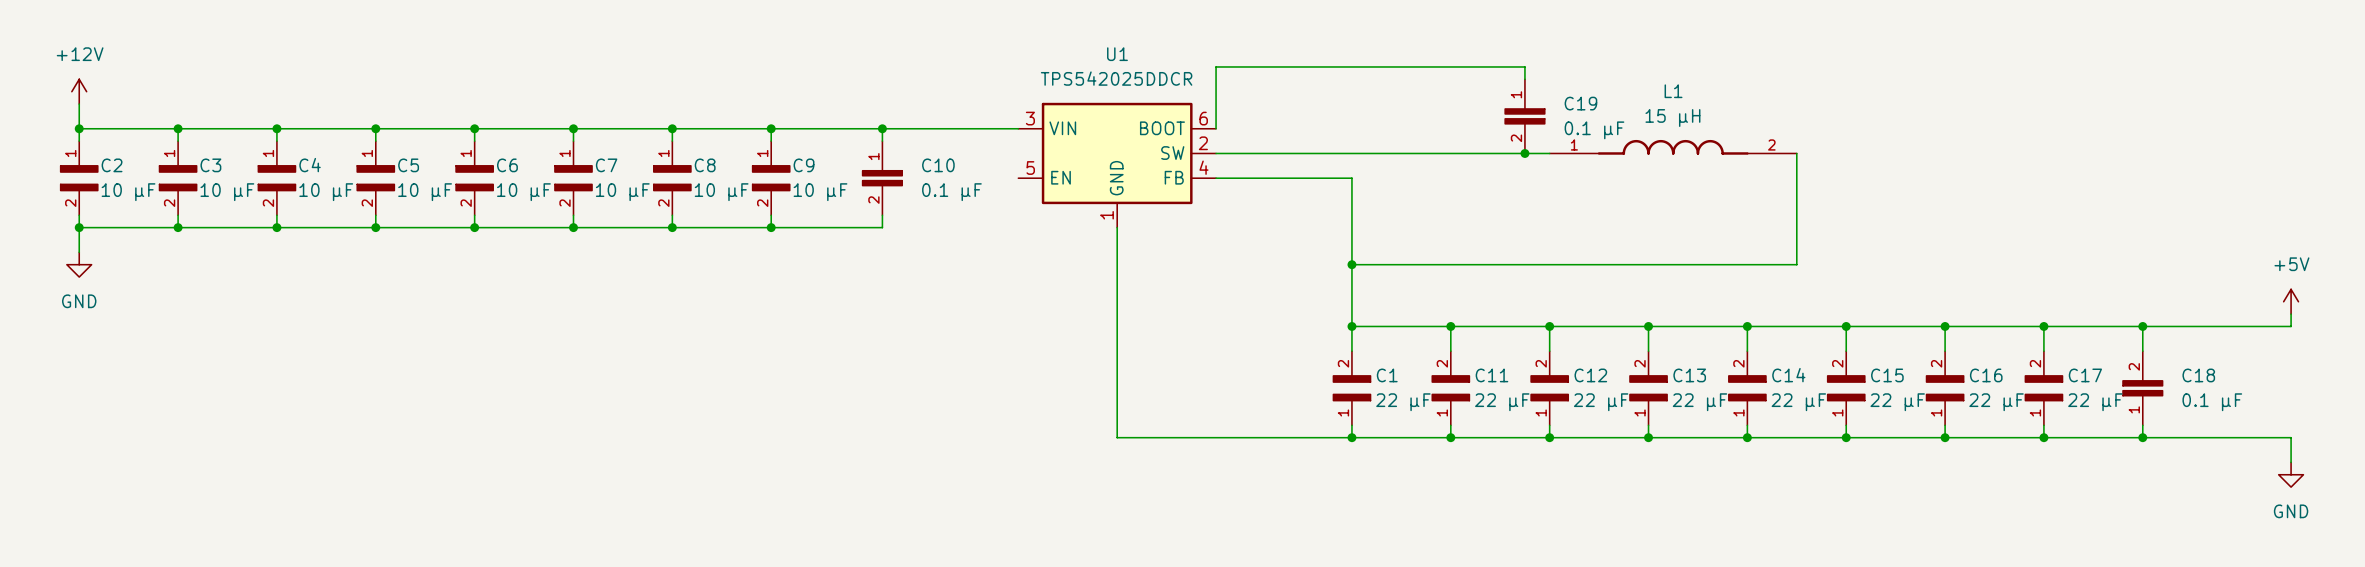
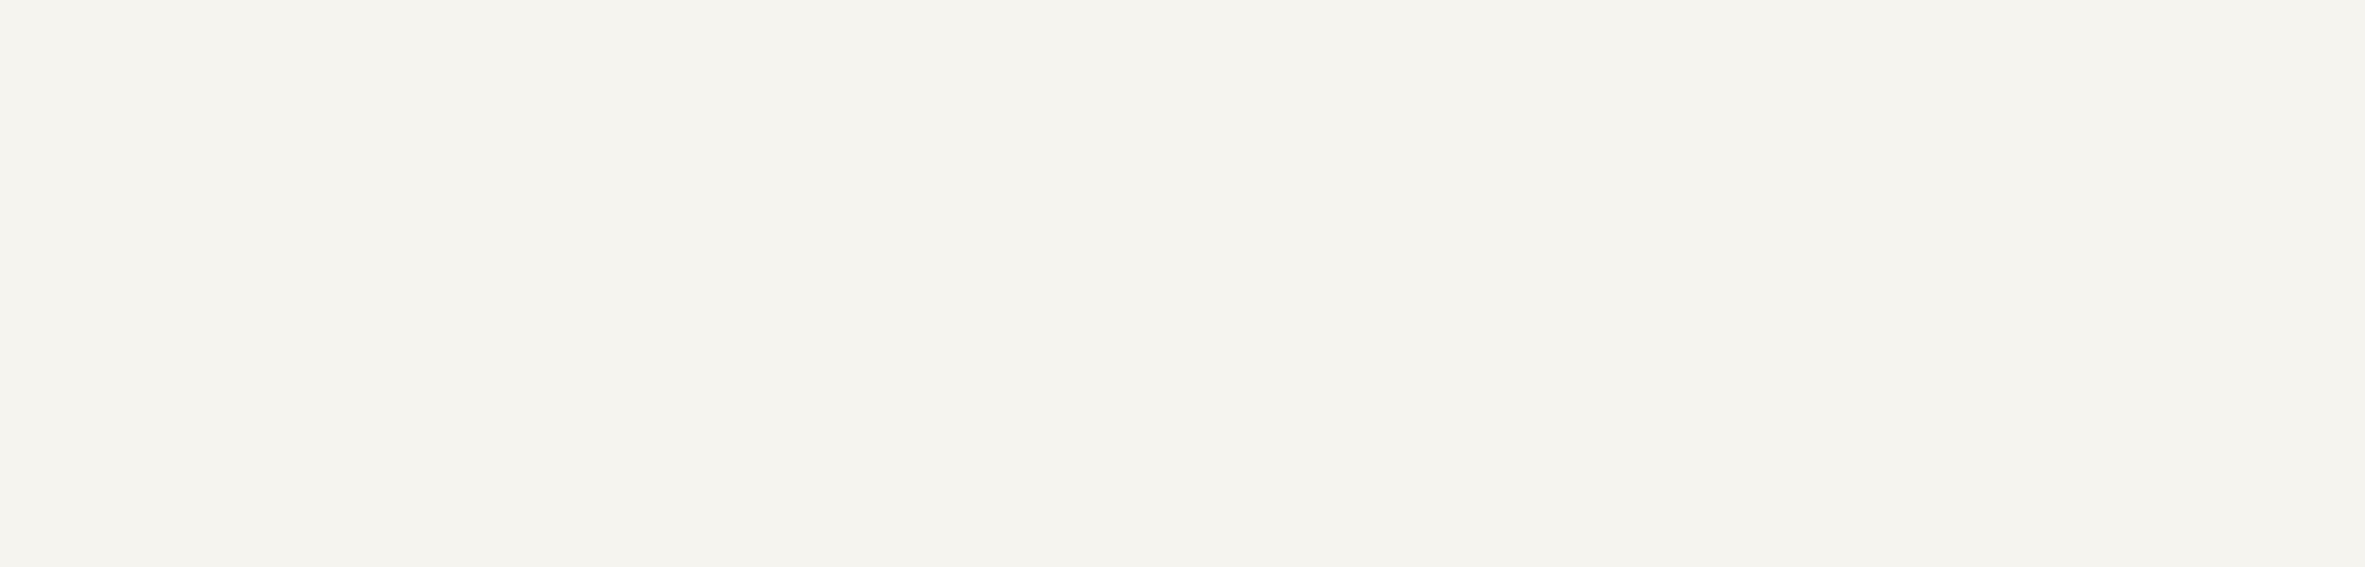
wire: (1524, 79) (1524, 66) (1216, 66) (1216, 128) -> none
power symbol: +12V (79, 91) -> none
wire: (79, 104) (79, 141) -> none
C19: 0.1 µF (1524, 116) -> none
wire: (79, 128) (1018, 128) -> none
junction: (79, 128) -> none
wire: (178, 128) (178, 141) -> none
junction: (178, 128) -> none
wire: (276, 128) (276, 141) -> none
junction: (276, 128) -> none
wire: (375, 128) (375, 141) -> none
junction: (375, 128) -> none
wire: (474, 128) (474, 141) -> none
junction: (474, 128) -> none
wire: (573, 128) (573, 141) -> none
junction: (573, 128) -> none
wire: (672, 128) (672, 141) -> none
junction: (672, 128) -> none
wire: (771, 128) (771, 141) -> none
junction: (771, 128) -> none
wire: (882, 128) (882, 141) -> none
junction: (882, 128) -> none
L1: 15 µH (1673, 147) -> none
wire: (1216, 153) (1549, 153) -> none
junction: (1524, 153) -> none
wire: (1796, 153) (1796, 264) (1351, 264) -> none
U1: TPS542025DDCR (1117, 165) -> none
C2: 10 µF (79, 178) -> none
C3: 10 µF (178, 178) -> none
C4: 10 µF (276, 178) -> none
C5: 10 µF (375, 178) -> none
C6: 10 µF (474, 178) -> none
C7: 10 µF (573, 178) -> none
C8: 10 µF (672, 178) -> none
C9: 10 µF (771, 178) -> none
C10: 0.1 µF (882, 178) -> none
wire: (1216, 178) (1351, 178) (1351, 351) -> none
wire: (79, 215) (79, 252) -> none
wire: (178, 215) (178, 227) -> none
wire: (276, 215) (276, 227) -> none
wire: (375, 215) (375, 227) -> none
wire: (474, 215) (474, 227) -> none
wire: (573, 215) (573, 227) -> none
wire: (672, 215) (672, 227) -> none
wire: (771, 215) (771, 227) -> none
wire: (882, 215) (882, 227) (79, 227) -> none
junction: (79, 227) -> none
junction: (178, 227) -> none
junction: (276, 227) -> none
junction: (375, 227) -> none
junction: (474, 227) -> none
junction: (573, 227) -> none
junction: (672, 227) -> none
junction: (771, 227) -> none
wire: (1117, 227) (1117, 437) (2291, 437) (2291, 462) -> none
power symbol: GND (79, 264) -> none
junction: (1351, 264) -> none
power symbol: +5V (2291, 301) -> none
wire: (2291, 314) (2291, 326) (1351, 326) -> none
junction: (1351, 326) -> none
wire: (1450, 326) (1450, 351) -> none
junction: (1450, 326) -> none
wire: (1549, 326) (1549, 351) -> none
junction: (1549, 326) -> none
wire: (1648, 326) (1648, 351) -> none
junction: (1648, 326) -> none
wire: (1747, 326) (1747, 351) -> none
junction: (1747, 326) -> none
wire: (1846, 326) (1846, 351) -> none
junction: (1846, 326) -> none
wire: (1945, 326) (1945, 351) -> none
junction: (1945, 326) -> none
wire: (2043, 326) (2043, 351) -> none
junction: (2043, 326) -> none
wire: (2142, 326) (2142, 351) -> none
junction: (2142, 326) -> none
C1: 22 µF (1351, 388) -> none
C11: 22 µF (1450, 388) -> none
C12: 22 µF (1549, 388) -> none
C13: 22 µF (1648, 388) -> none
C14: 22 µF (1747, 388) -> none
C15: 22 µF (1846, 388) -> none
C16: 22 µF (1945, 388) -> none
C17: 22 µF (2043, 388) -> none
C18: 0.1 µF (2142, 388) -> none
wire: (1351, 425) (1351, 437) -> none
wire: (1450, 425) (1450, 437) -> none
wire: (1549, 425) (1549, 437) -> none
wire: (1648, 425) (1648, 437) -> none
wire: (1747, 425) (1747, 437) -> none
wire: (1846, 425) (1846, 437) -> none
wire: (1945, 425) (1945, 437) -> none
wire: (2043, 425) (2043, 437) -> none
wire: (2142, 425) (2142, 437) -> none
junction: (1351, 437) -> none
junction: (1450, 437) -> none
junction: (1549, 437) -> none
junction: (1648, 437) -> none
junction: (1747, 437) -> none
junction: (1846, 437) -> none
junction: (1945, 437) -> none
junction: (2043, 437) -> none
junction: (2142, 437) -> none
power symbol: GND (2291, 474) -> none

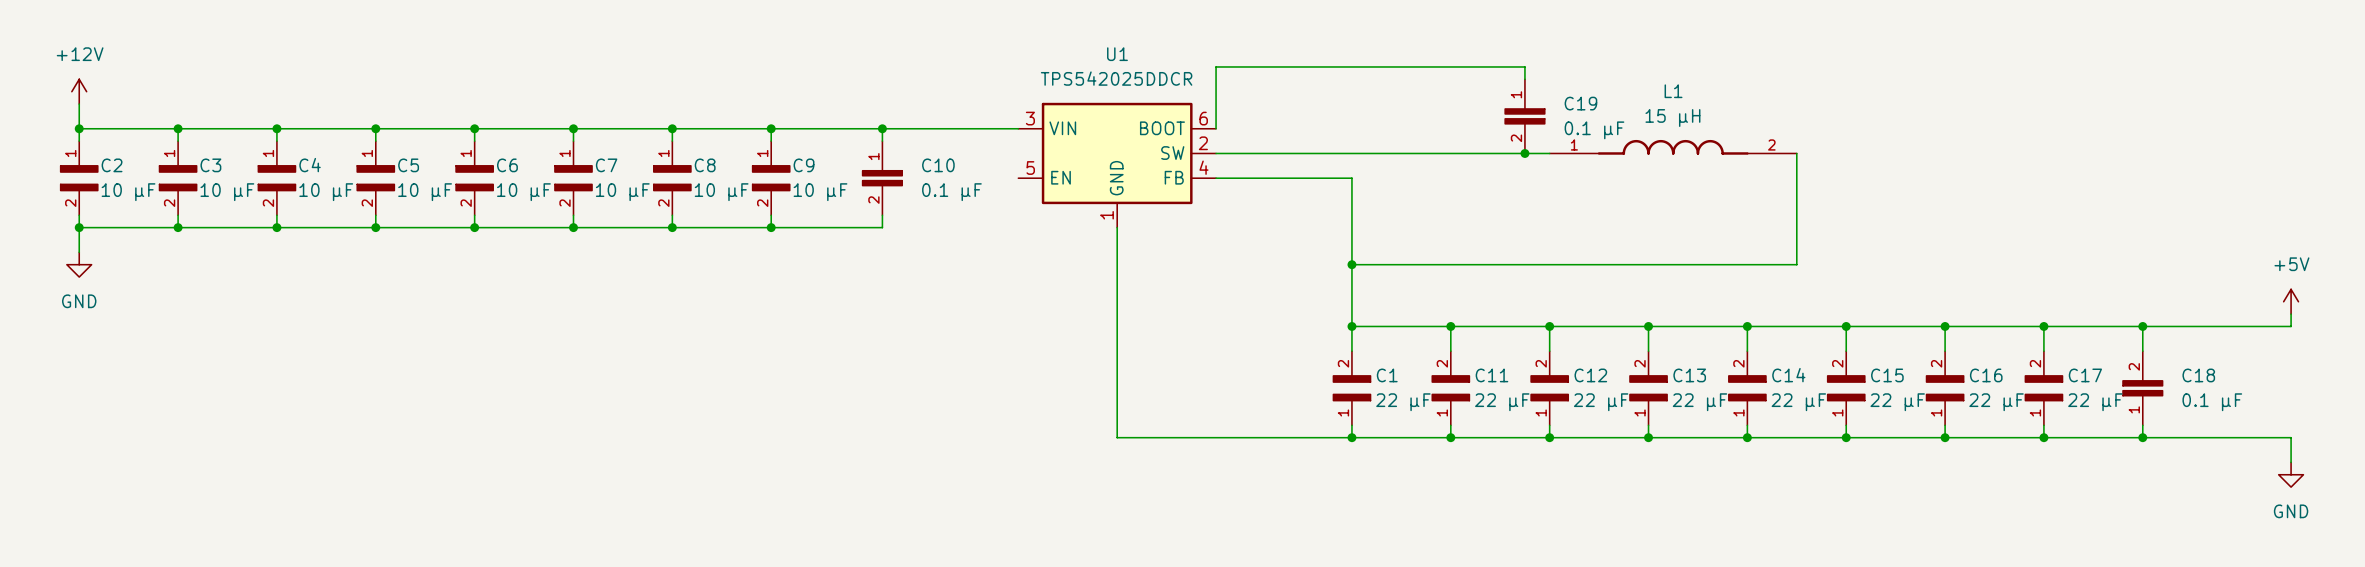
wire: none -> (1524, 79) (1524, 66) (1216, 66) (1216, 128)
power symbol: none -> +12V (79, 91)
wire: none -> (79, 104) (79, 141)
C19: none -> 0.1 µF (1524, 116)
wire: none -> (79, 128) (1018, 128)
junction: none -> (79, 128)
wire: none -> (178, 128) (178, 141)
junction: none -> (178, 128)
wire: none -> (276, 128) (276, 141)
junction: none -> (276, 128)
wire: none -> (375, 128) (375, 141)
junction: none -> (375, 128)
wire: none -> (474, 128) (474, 141)
junction: none -> (474, 128)
wire: none -> (573, 128) (573, 141)
junction: none -> (573, 128)
wire: none -> (672, 128) (672, 141)
junction: none -> (672, 128)
wire: none -> (771, 128) (771, 141)
junction: none -> (771, 128)
wire: none -> (882, 128) (882, 141)
junction: none -> (882, 128)
L1: none -> 15 µH (1673, 147)
wire: none -> (1216, 153) (1549, 153)
junction: none -> (1524, 153)
wire: none -> (1796, 153) (1796, 264) (1351, 264)
U1: none -> TPS542025DDCR (1117, 165)
C2: none -> 10 µF (79, 178)
C3: none -> 10 µF (178, 178)
C4: none -> 10 µF (276, 178)
C5: none -> 10 µF (375, 178)
C6: none -> 10 µF (474, 178)
C7: none -> 10 µF (573, 178)
C8: none -> 10 µF (672, 178)
C9: none -> 10 µF (771, 178)
C10: none -> 0.1 µF (882, 178)
wire: none -> (1216, 178) (1351, 178) (1351, 351)
wire: none -> (79, 215) (79, 252)
wire: none -> (178, 215) (178, 227)
wire: none -> (276, 215) (276, 227)
wire: none -> (375, 215) (375, 227)
wire: none -> (474, 215) (474, 227)
wire: none -> (573, 215) (573, 227)
wire: none -> (672, 215) (672, 227)
wire: none -> (771, 215) (771, 227)
wire: none -> (882, 215) (882, 227) (79, 227)
junction: none -> (79, 227)
junction: none -> (178, 227)
junction: none -> (276, 227)
junction: none -> (375, 227)
junction: none -> (474, 227)
junction: none -> (573, 227)
junction: none -> (672, 227)
junction: none -> (771, 227)
wire: none -> (1117, 227) (1117, 437) (2291, 437) (2291, 462)
power symbol: none -> GND (79, 264)
junction: none -> (1351, 264)
power symbol: none -> +5V (2291, 301)
wire: none -> (2291, 314) (2291, 326) (1351, 326)
junction: none -> (1351, 326)
wire: none -> (1450, 326) (1450, 351)
junction: none -> (1450, 326)
wire: none -> (1549, 326) (1549, 351)
junction: none -> (1549, 326)
wire: none -> (1648, 326) (1648, 351)
junction: none -> (1648, 326)
wire: none -> (1747, 326) (1747, 351)
junction: none -> (1747, 326)
wire: none -> (1846, 326) (1846, 351)
junction: none -> (1846, 326)
wire: none -> (1945, 326) (1945, 351)
junction: none -> (1945, 326)
wire: none -> (2043, 326) (2043, 351)
junction: none -> (2043, 326)
wire: none -> (2142, 326) (2142, 351)
junction: none -> (2142, 326)
C1: none -> 22 µF (1351, 388)
C11: none -> 22 µF (1450, 388)
C12: none -> 22 µF (1549, 388)
C13: none -> 22 µF (1648, 388)
C14: none -> 22 µF (1747, 388)
C15: none -> 22 µF (1846, 388)
C16: none -> 22 µF (1945, 388)
C17: none -> 22 µF (2043, 388)
C18: none -> 0.1 µF (2142, 388)
wire: none -> (1351, 425) (1351, 437)
wire: none -> (1450, 425) (1450, 437)
wire: none -> (1549, 425) (1549, 437)
wire: none -> (1648, 425) (1648, 437)
wire: none -> (1747, 425) (1747, 437)
wire: none -> (1846, 425) (1846, 437)
wire: none -> (1945, 425) (1945, 437)
wire: none -> (2043, 425) (2043, 437)
wire: none -> (2142, 425) (2142, 437)
junction: none -> (1351, 437)
junction: none -> (1450, 437)
junction: none -> (1549, 437)
junction: none -> (1648, 437)
junction: none -> (1747, 437)
junction: none -> (1846, 437)
junction: none -> (1945, 437)
junction: none -> (2043, 437)
junction: none -> (2142, 437)
power symbol: none -> GND (2291, 474)

